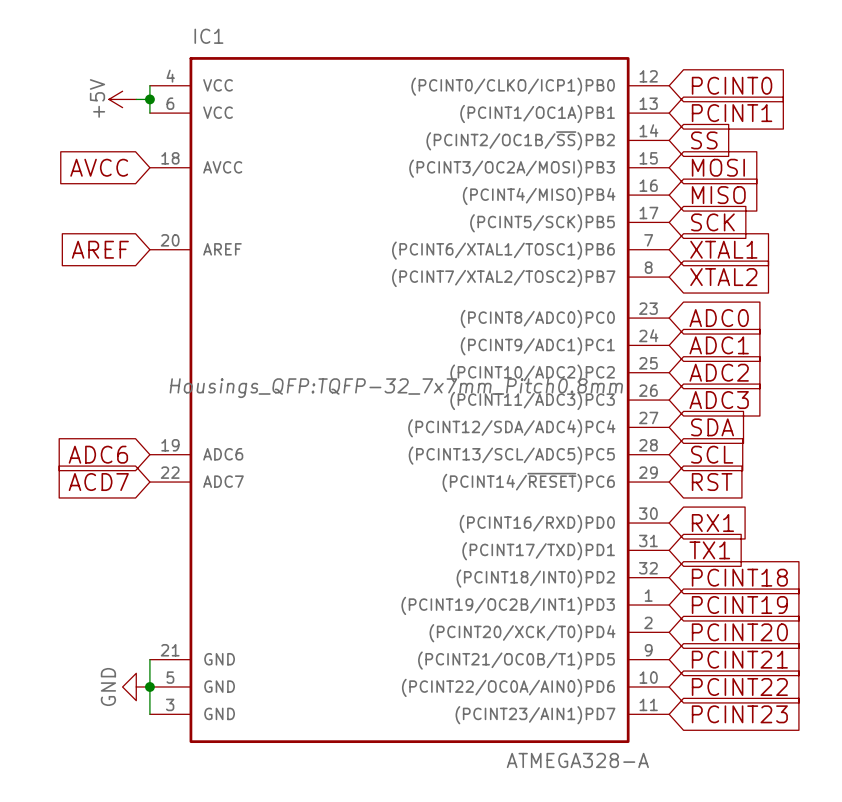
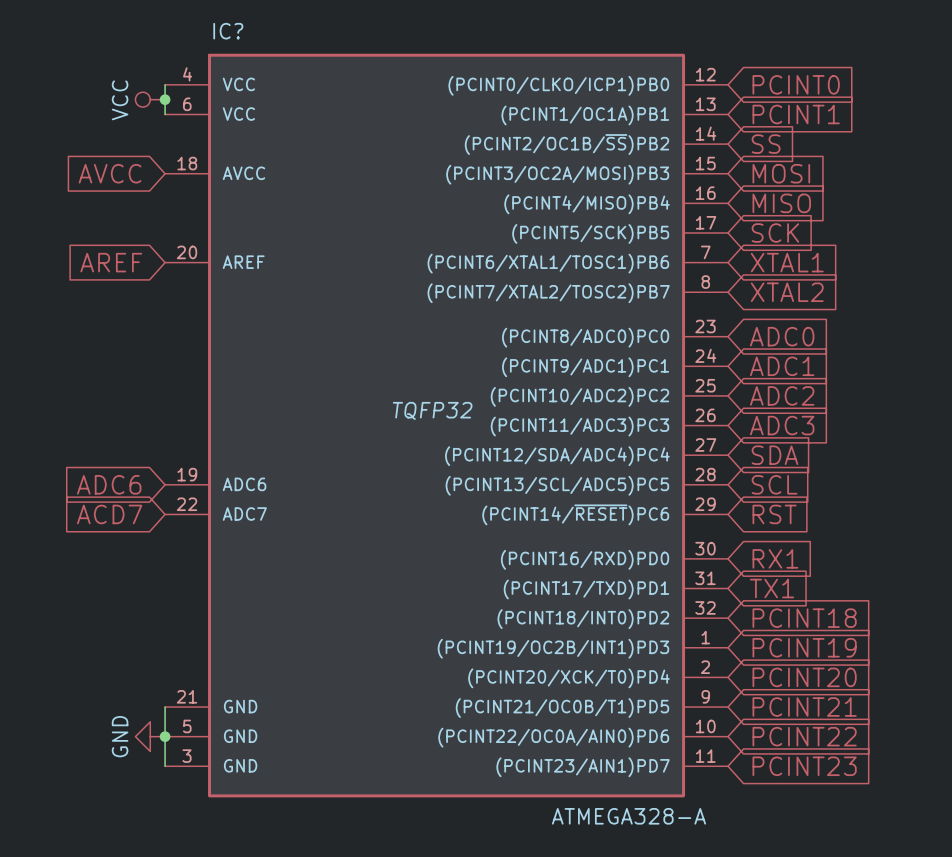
IC1 name: IC1 (208, 36) -> IC? (228, 31)
power symbol: +5V (122, 99) -> none
power symbol: none -> VCC (150, 99)
IC1 text: Housings_QFP:TQFP-32_7x7mm_Pitch0.8mm (396, 388) -> TQFP32 (432, 410)

